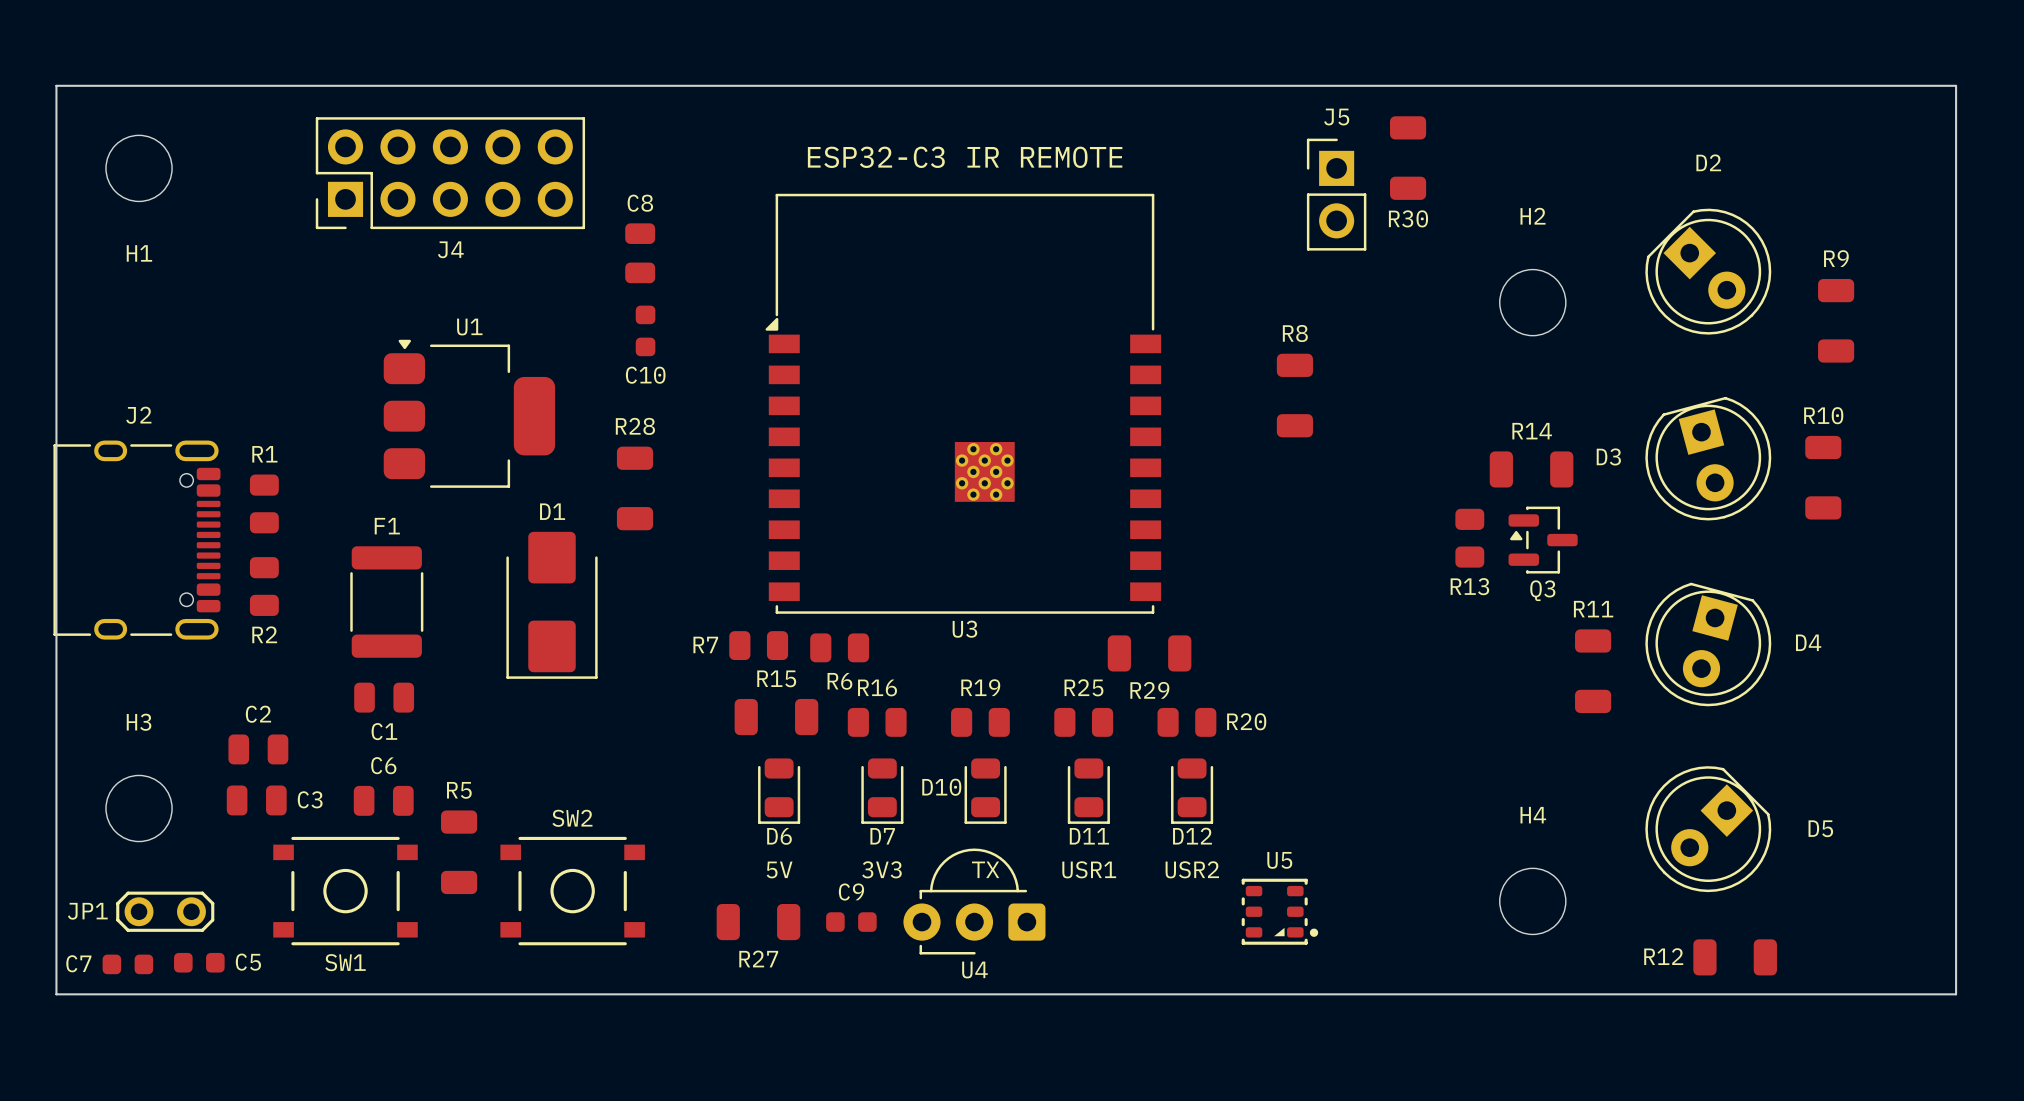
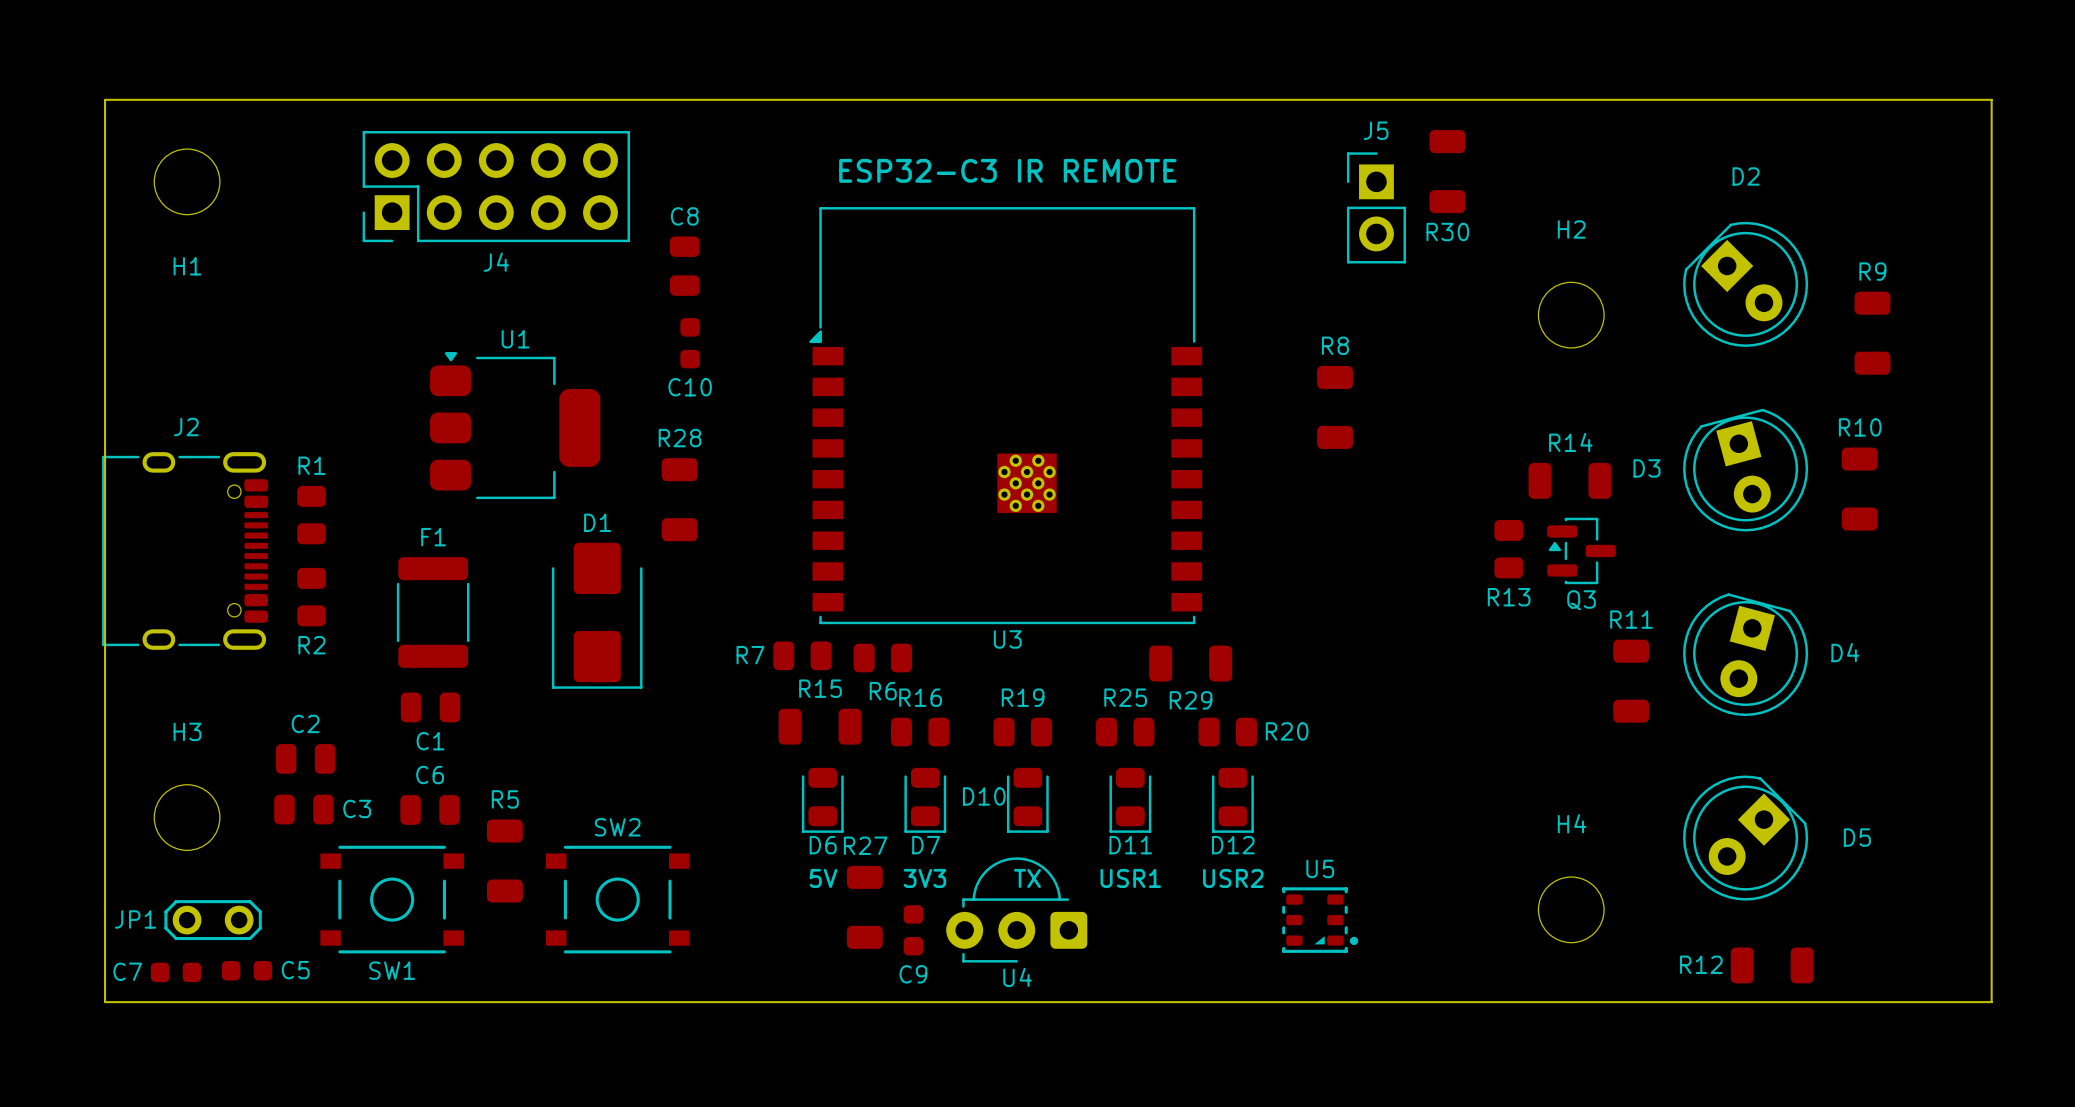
C9 name position: C9 (851, 892) -> C9 (913, 974)
R27 rotation: 0° (758, 922) -> 90° clockwise (864, 907)
R27 position: (758, 922) -> (864, 907)
C9 rotation: 0° (851, 922) -> 90° clockwise (913, 930)
R27 name position: R27 (758, 958) -> R27 (865, 845)

